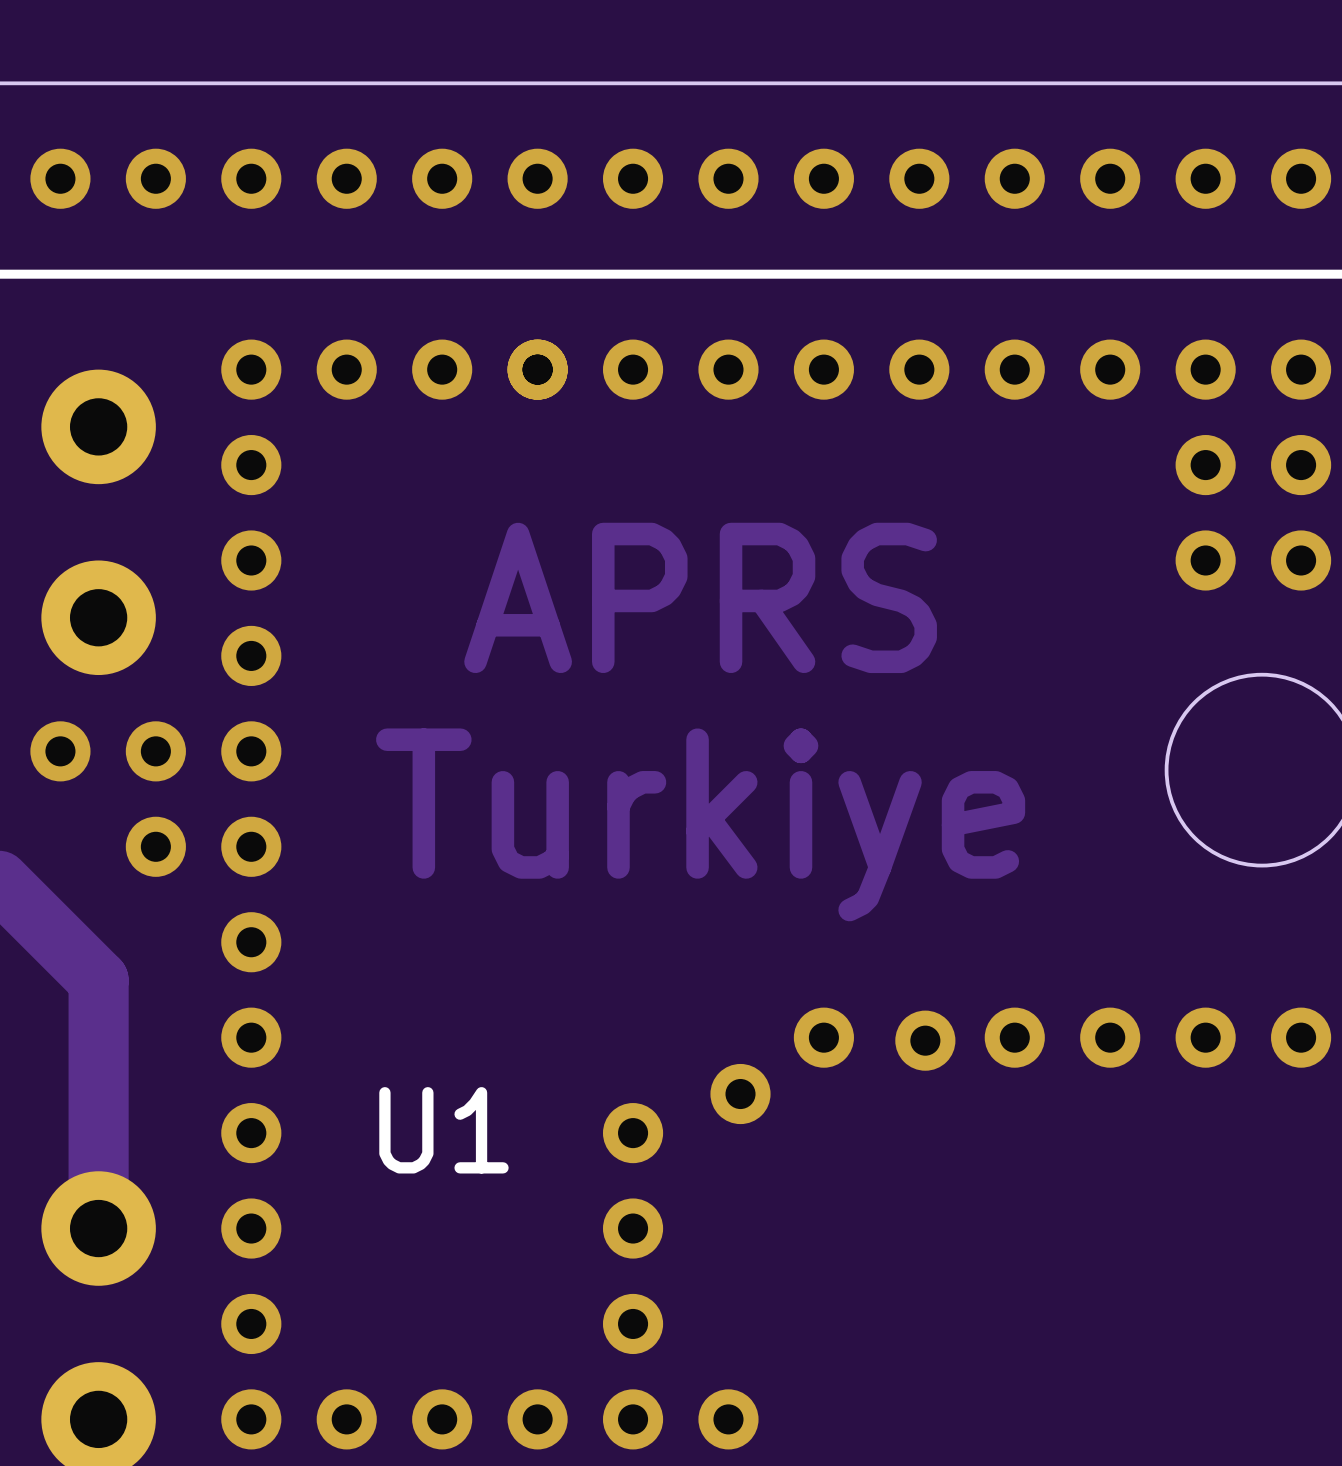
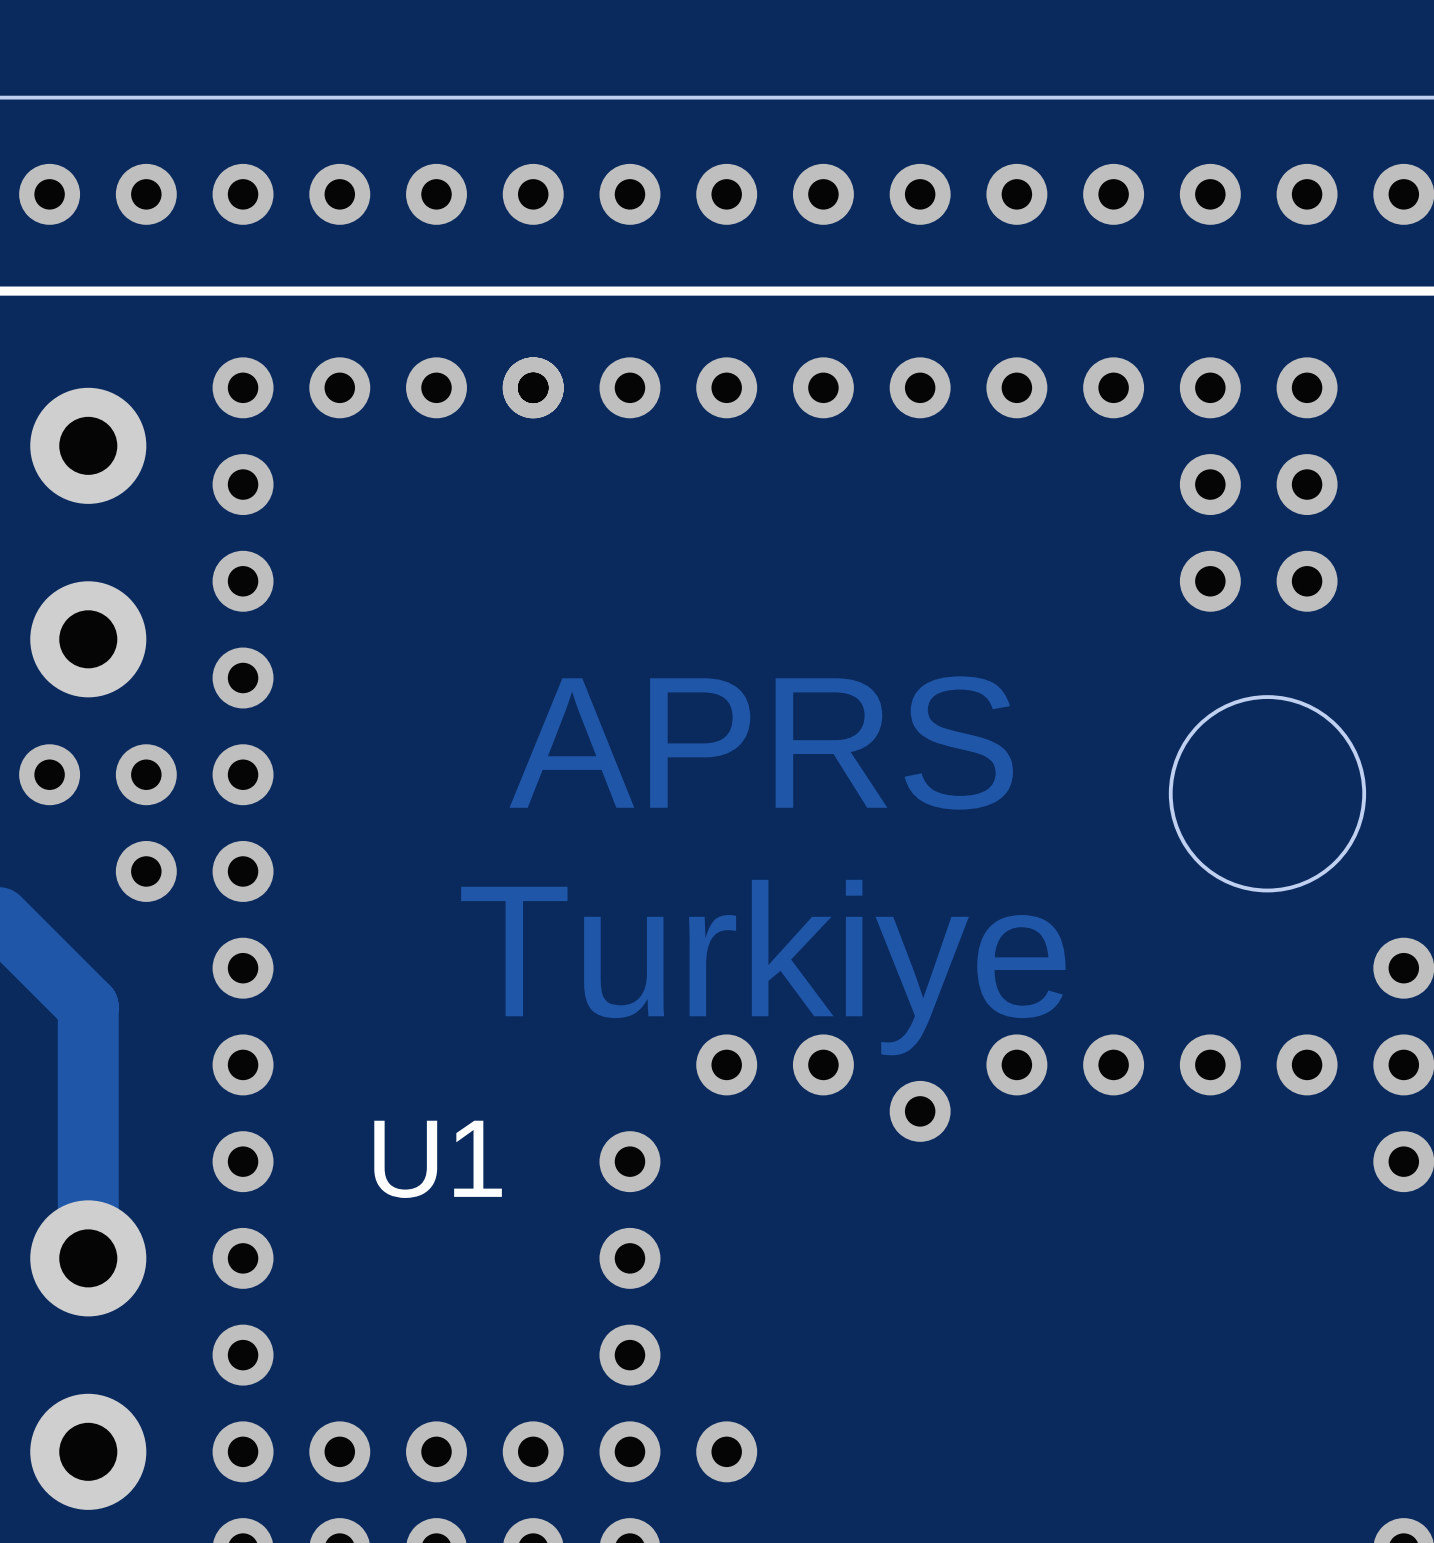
text position: APRS (700, 597) -> APRS (761, 743)
text position: Turkiye (700, 824) -> Turkiye (763, 967)
via position: (925, 1040) -> (920, 1111)
via position: (740, 1094) -> (726, 1064)

